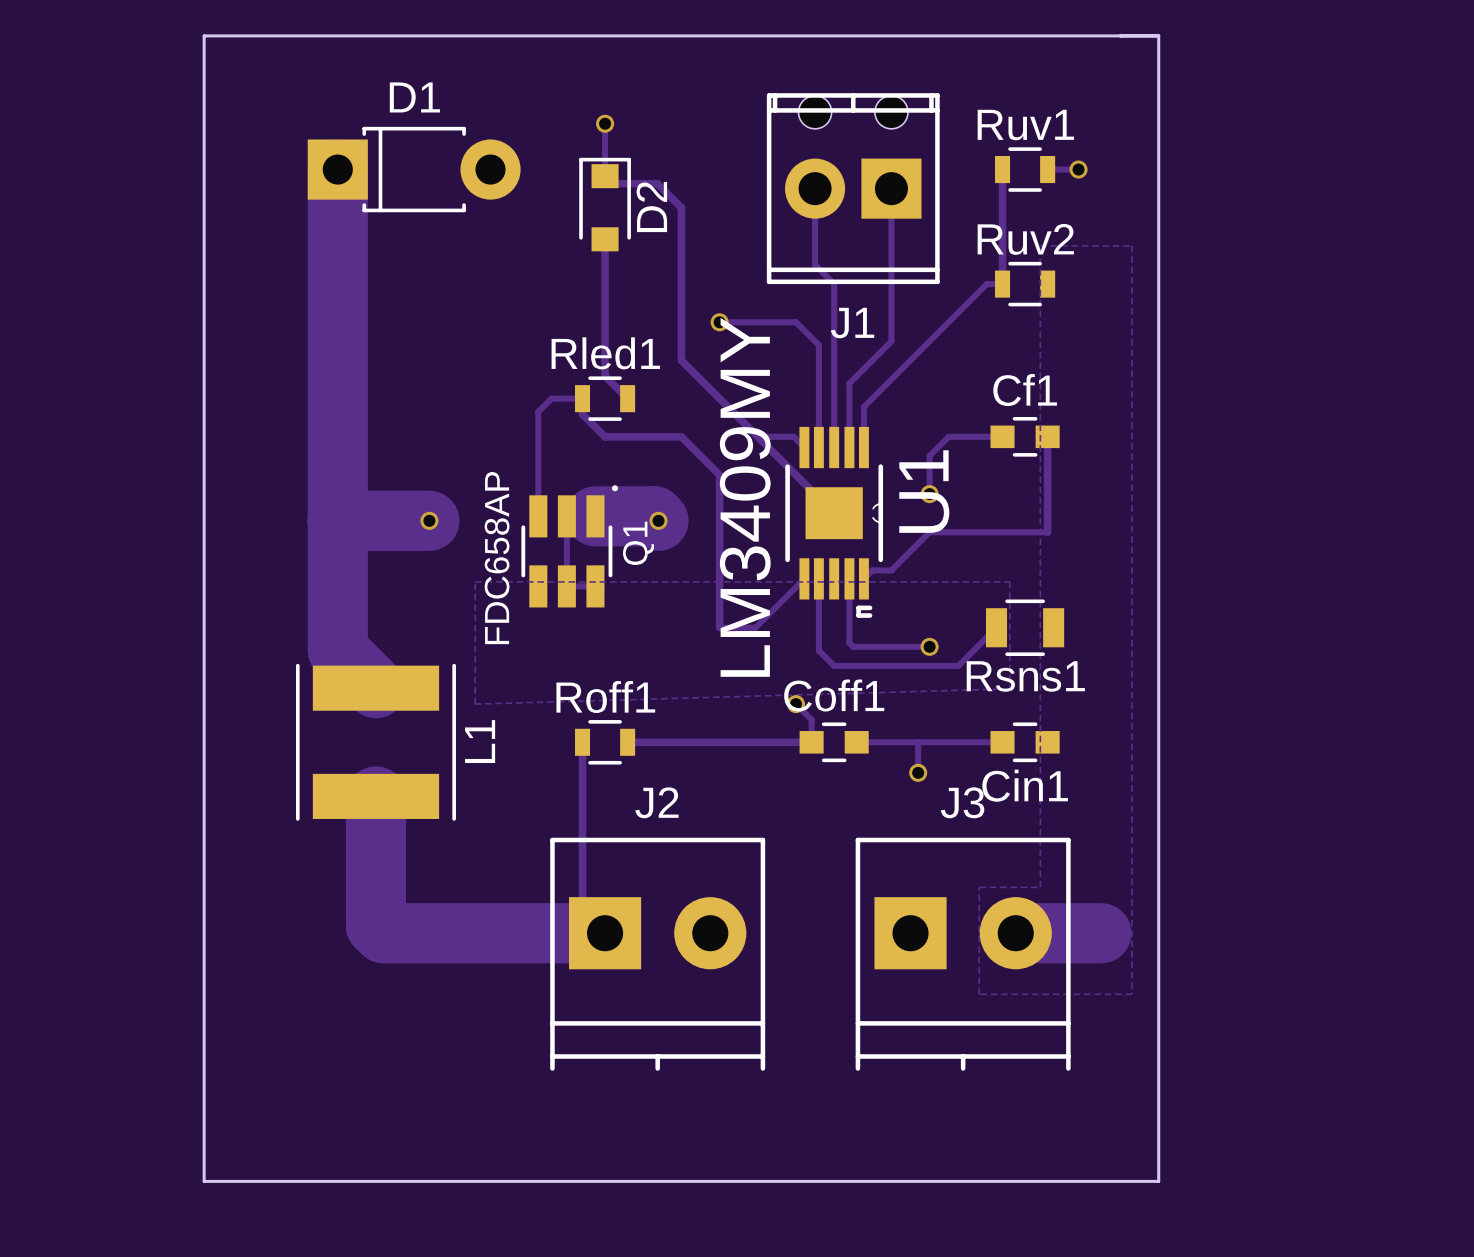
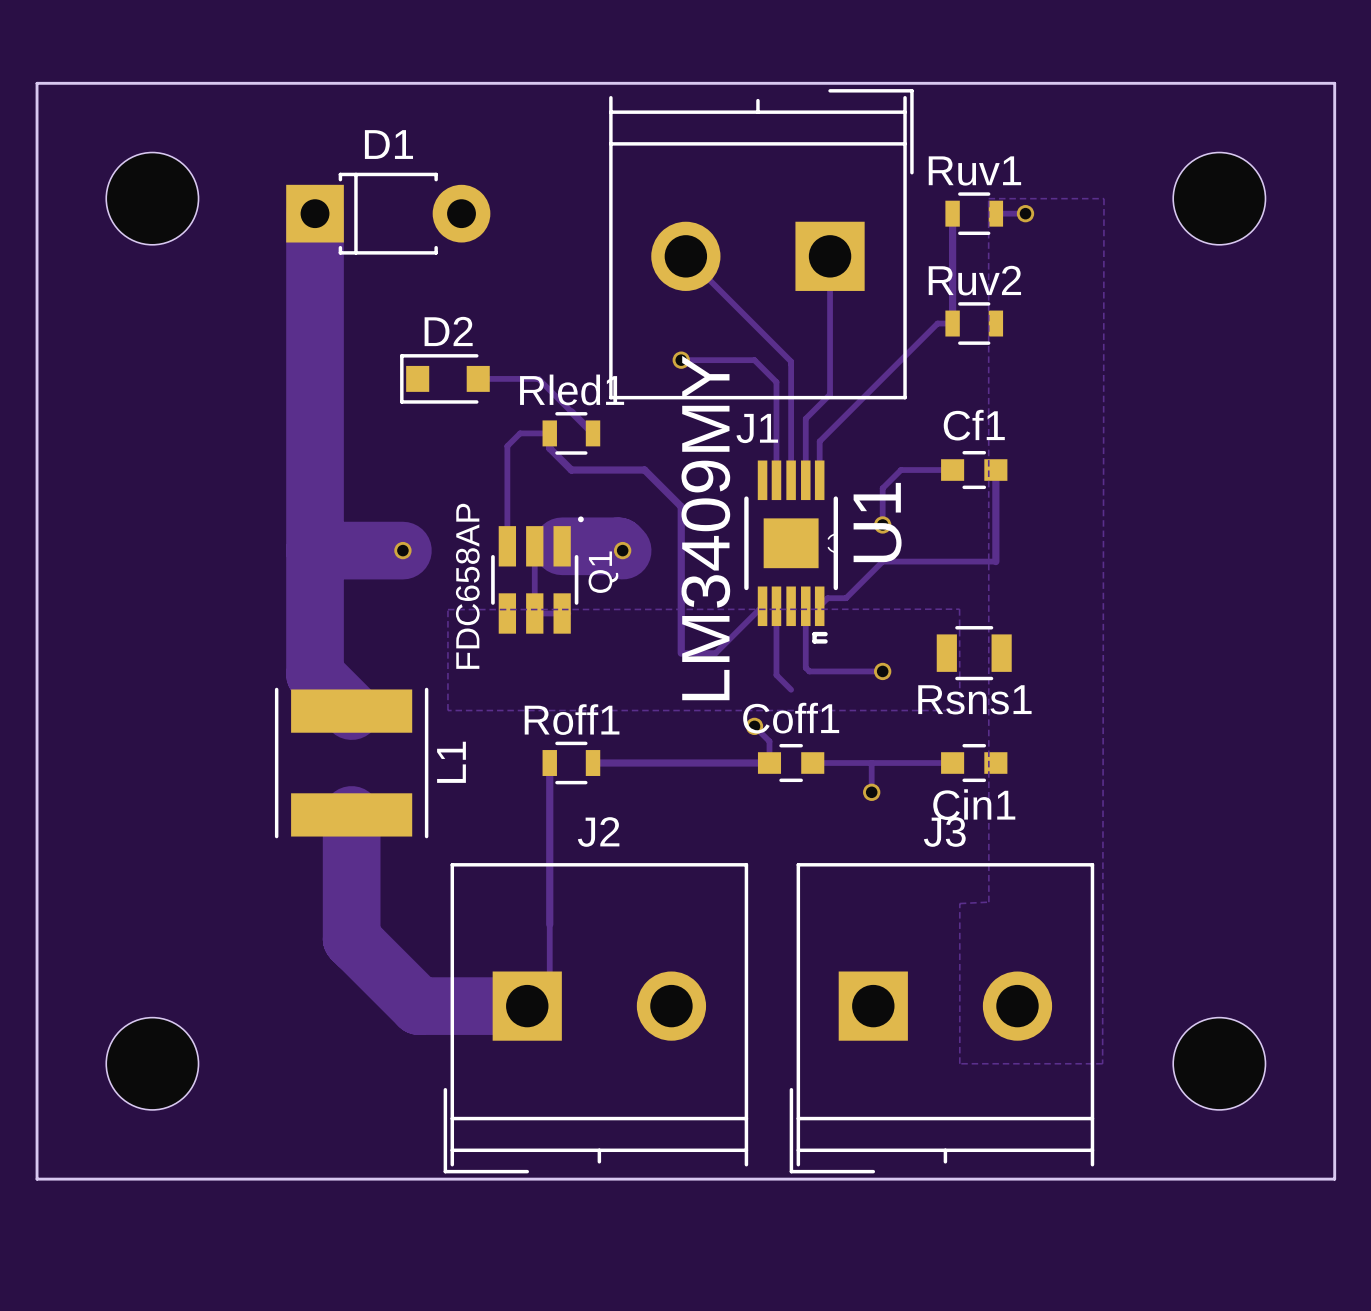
board edge: (204, 35) (1158, 35) (1158, 1181) (204, 1181) (204, 35) -> (37, 83) (37, 1179) (1334, 1179) (1334, 83) (37, 83)
J1 footprint: [766, 93, 940, 285] -> [609, 89, 914, 400]
track: (605, 123) (605, 176) -> none
via: (605, 123) -> none
part: none -> (152, 198)
part: none -> (1219, 198)
track: (605, 183) (657, 183) (681, 207) (681, 360) (834, 513) -> none
track: (815, 188) (815, 265) (834, 284) (834, 323) -> (685, 256) (791, 361)
track: (891, 188) (891, 341) (874, 358) -> (830, 256) (830, 394)
D2 rotation: 0° (605, 204) -> 90° counterclockwise (444, 378)
D2 position: (605, 204) -> (444, 378)
track: (605, 231) (605, 376) -> (478, 378) (538, 378) (571, 411)
zone outline: (1040, 245) (1040, 887) (979, 887) (979, 994) (1132, 994) (1132, 245) (1040, 245) -> (988, 198) (988, 902) (959, 903) (959, 1063) (1102, 1063) (1104, 198) (988, 198)
track: (757, 436) (793, 436) (804, 447) -> none
zone outline: (475, 581) (475, 704) (1009, 688) (1009, 581) (475, 581) -> (959, 609) (447, 609) (447, 710) (959, 710) (959, 609)
track: (996, 627) (958, 665) (834, 665) -> none
J2 footprint: [550, 837, 766, 1071] -> [443, 863, 749, 1174]
J3 footprint: [855, 837, 1071, 1071] -> [789, 863, 1095, 1174]
track: (582, 910) (605, 933) (383, 933) -> (549, 924) (549, 983) (527, 1006) (418, 1006) (358, 946)
track: (1015, 933) (1101, 933) -> none
part: none -> (152, 1063)
part: none -> (1219, 1063)

